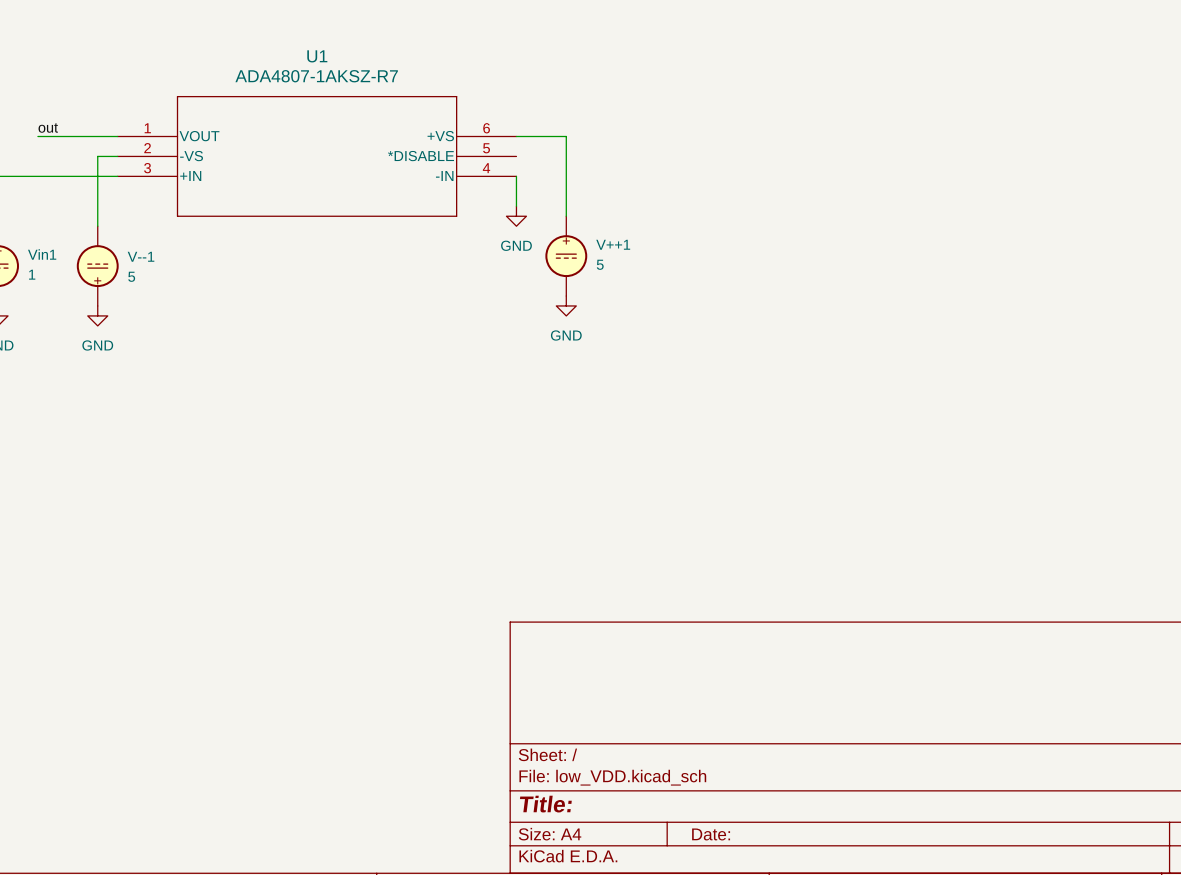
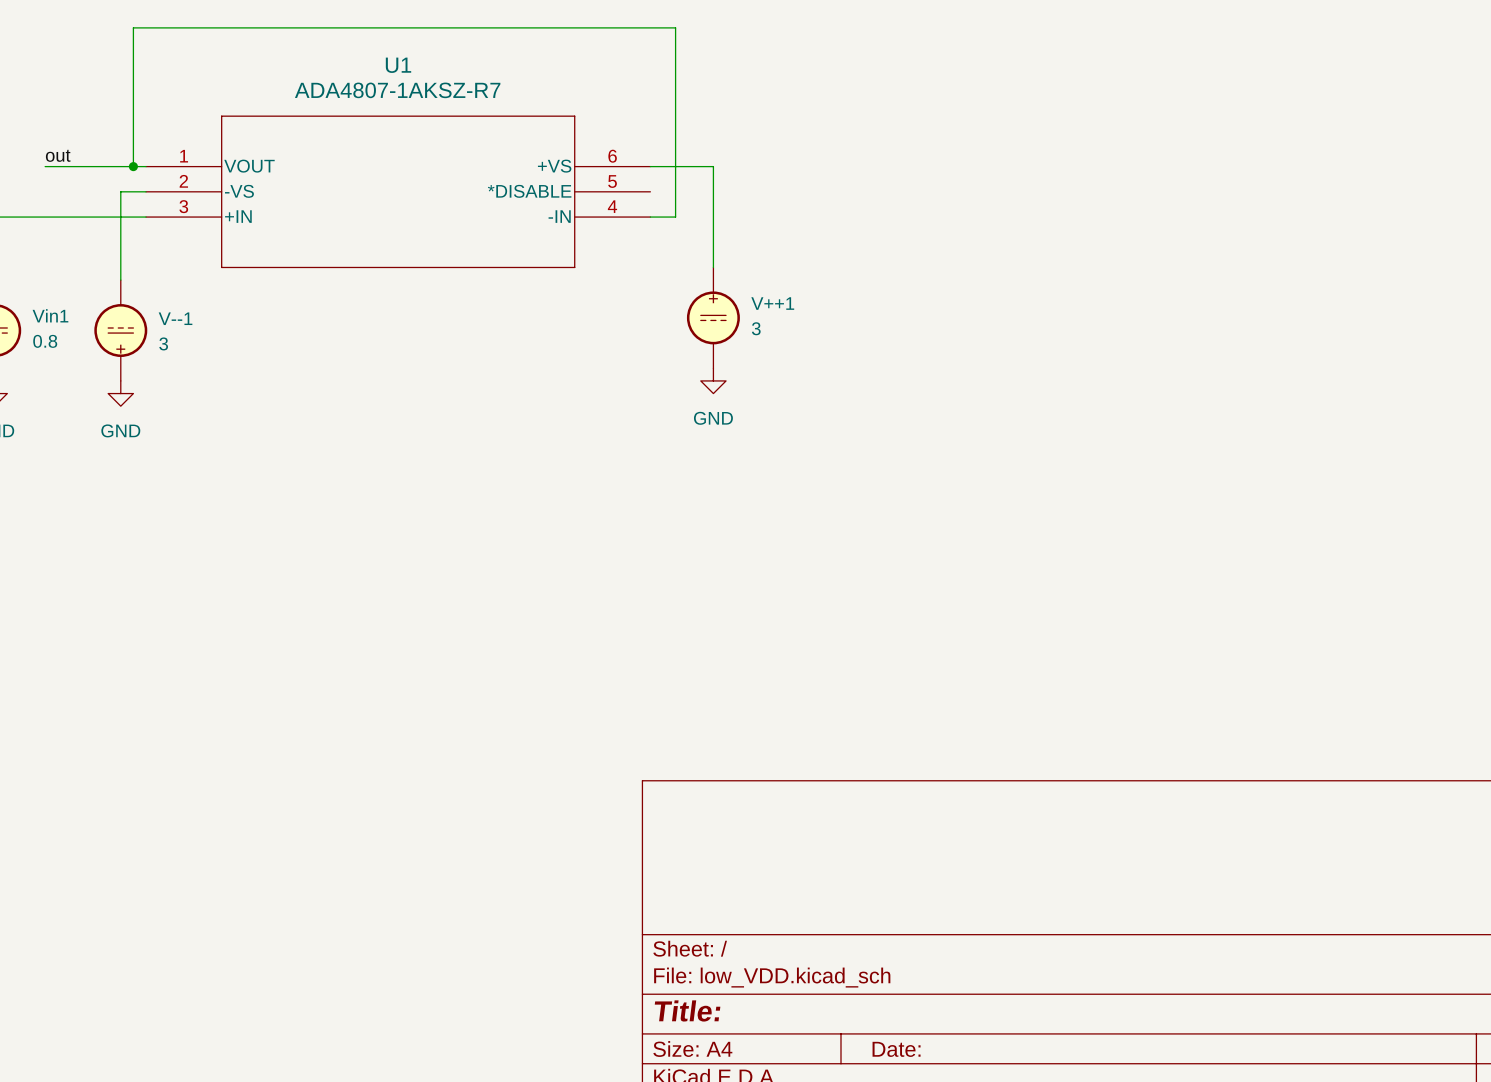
junction: none -> (133, 166)
wire: (516, 176) (516, 206) -> (650, 217) (675, 217) (675, 27) (133, 27) (133, 166)
power symbol: GND (516, 216) -> none
V++1 value: 5 (600, 264) -> 3 (756, 328)
Vin1 value: 1 (32, 274) -> 0.8 (45, 341)
V--1 value: 5 (131, 276) -> 3 (163, 343)

